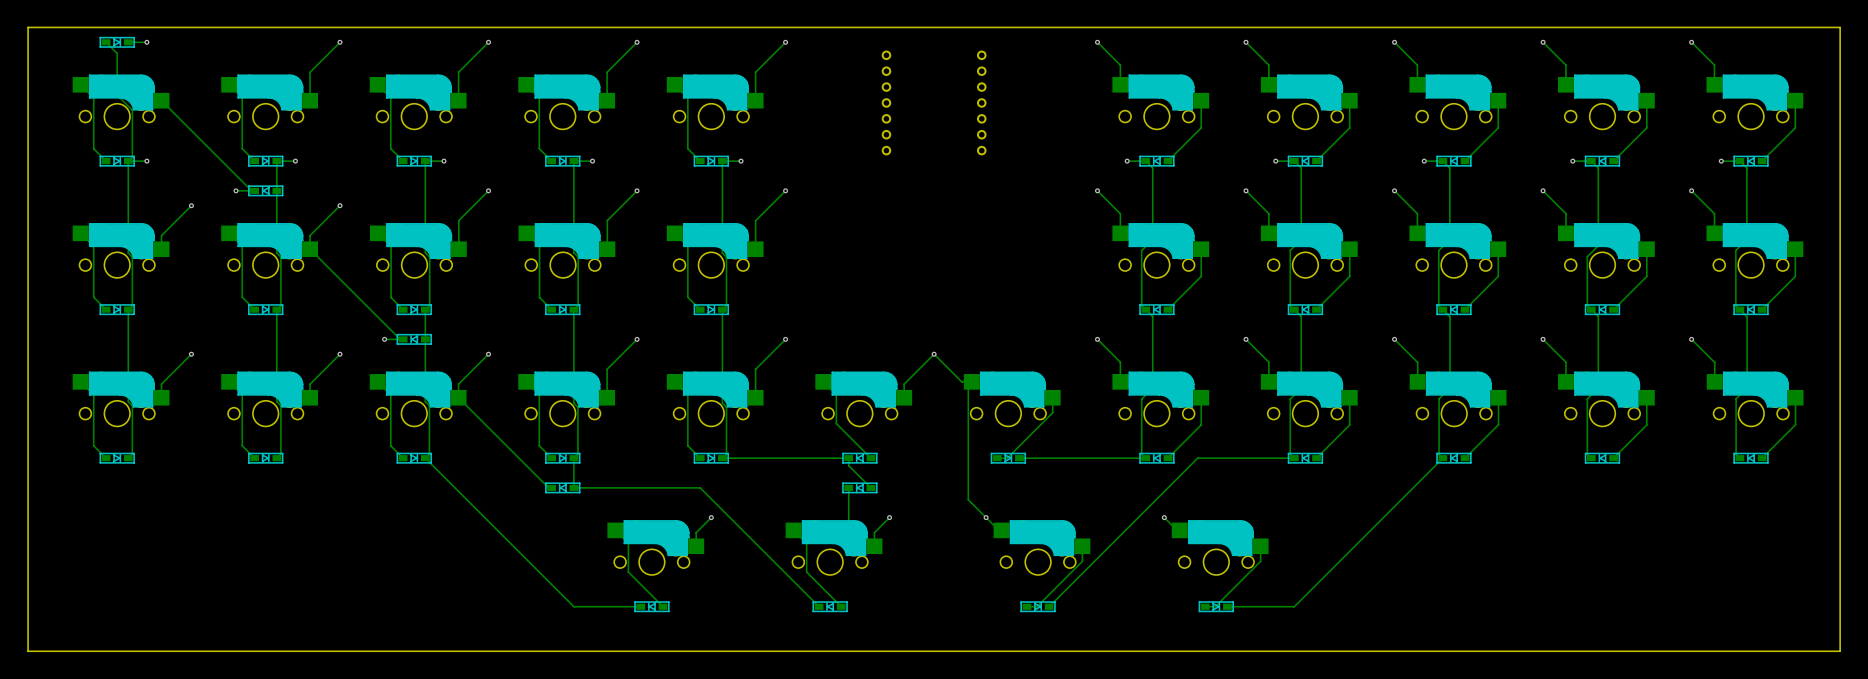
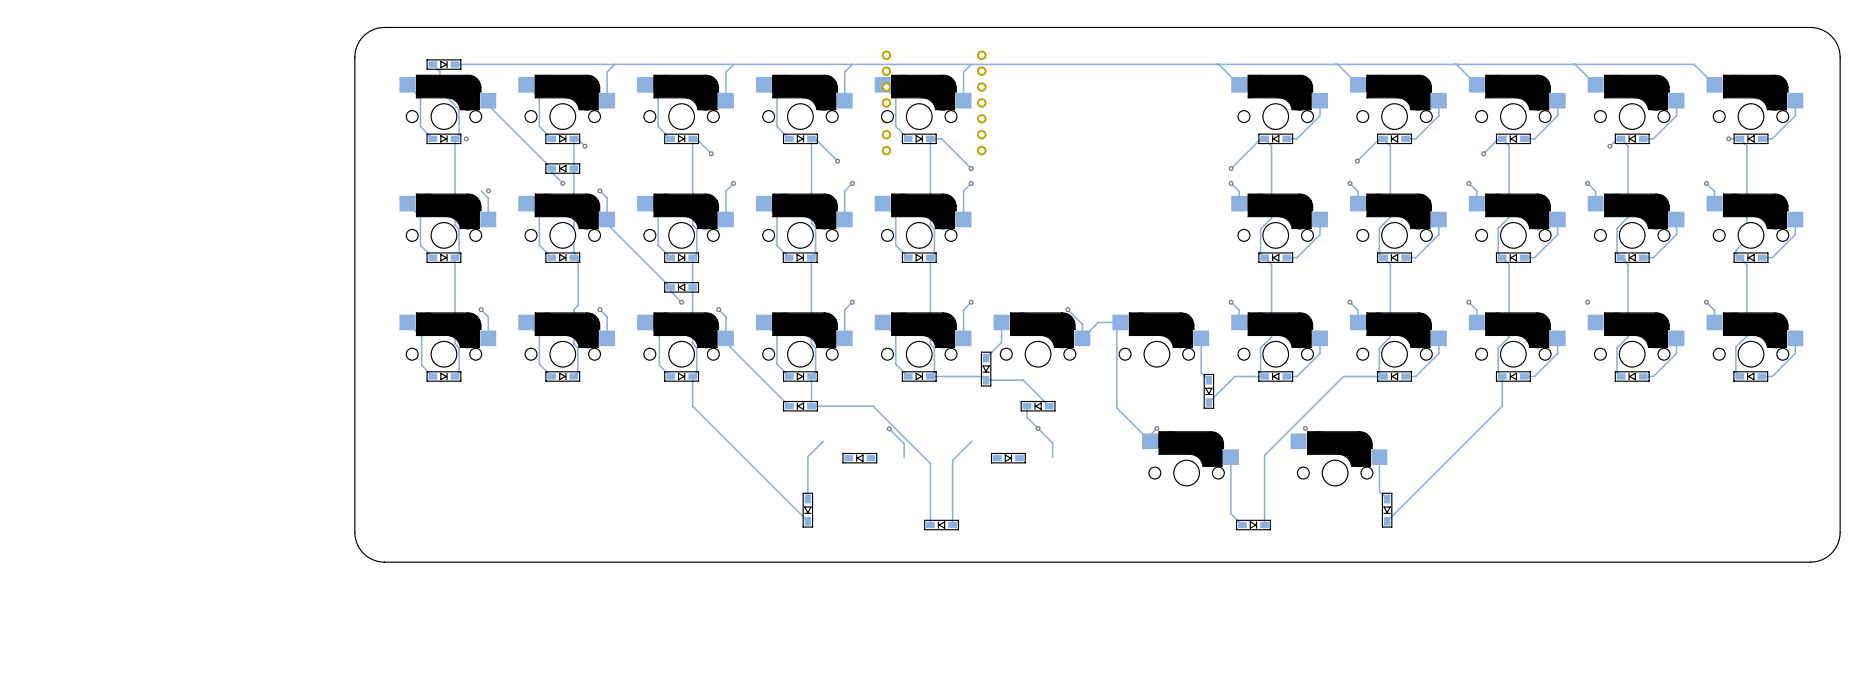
board edge: (384, 27) (28, 27) (28, 651) (1840, 651) (1840, 532) -> (384, 27) (374, 29) (363, 36) (356, 47) (354, 57) (354, 532) (359, 548) (366, 555) (374, 560) (384, 562) (1810, 562) (1823, 559) (1831, 553) (1837, 545) (1840, 532)
board edge: (1810, 27) (1840, 27) (1840, 57) -> (1810, 27) (1820, 29) (1831, 36) (1838, 47) (1840, 57)
track: (106, 42) (117, 53) (117, 95) (132, 110) (132, 157) (128, 161) -> none
part: (117, 42) -> none
track: (146, 42) (128, 42) -> none
via: (146, 42) -> none
track: (339, 42) (310, 72) (310, 100) -> none
via: (339, 42) -> none
track: (488, 42) (458, 72) (458, 100) -> none
via: (488, 42) -> none
track: (637, 42) (607, 72) -> (614, 64) (607, 72)
via: (637, 42) -> none
track: (785, 42) (755, 72) (755, 100) -> none
via: (785, 42) -> none
track: (1097, 42) (1120, 65) (1120, 84) -> none
via: (1097, 42) -> none
track: (1246, 42) (1268, 65) (1268, 84) -> none
via: (1246, 42) -> none
track: (1394, 42) (1417, 65) (1417, 84) -> none
via: (1394, 42) -> none
track: (1543, 42) (1565, 65) (1565, 84) -> none
via: (1543, 42) -> none
track: (1691, 42) (1714, 65) (1714, 84) -> (455, 64) (1694, 64) (1714, 84)
via: (1691, 42) -> none
track: none -> (432, 64) (439, 71) (439, 90) (459, 109) (459, 134) (455, 138) (455, 225) (459, 229) (459, 253) (455, 257) (455, 343) (459, 347) (459, 372) (455, 376)
part: none -> (443, 64)
track: none -> (733, 64) (725, 72) (725, 100)
track: none -> (852, 64) (844, 72) (844, 100)
track: none -> (971, 64) (963, 72) (963, 100)
track: none -> (1218, 64) (1239, 84)
track: none -> (1337, 64) (1358, 84)
track: none -> (1456, 64) (1476, 84)
track: none -> (1575, 64) (1595, 84)
track: (80, 84) (93, 97) (93, 148) (106, 161) -> none
track: (229, 84) (242, 97) (242, 148) (254, 161) -> none
track: (377, 84) (390, 97) (390, 148) (403, 161) -> none
track: none -> (407, 84) (420, 97) (420, 126) (432, 138)
track: none -> (645, 84) (658, 97) (658, 126) (670, 138)
track: (674, 84) (687, 97) (687, 148) (700, 161) -> none
track: none -> (763, 84) (776, 97) (776, 126) (789, 138)
track: none -> (882, 84) (895, 97) (895, 126) (908, 138)
track: (161, 100) (251, 190) -> none
track: none -> (488, 100) (488, 105) (551, 168) (551, 172) (562, 183)
track: (1201, 100) (1201, 127) (1168, 161) -> none
track: none -> (1320, 100) (1320, 115) (1296, 138) (1286, 138)
track: (1349, 100) (1349, 127) (1316, 161) -> none
track: none -> (1438, 100) (1438, 115) (1415, 138) (1405, 138)
track: (1498, 100) (1498, 127) (1465, 161) -> none
track: none -> (1557, 100) (1557, 115) (1534, 138) (1524, 138)
track: (1646, 100) (1646, 127) (1613, 161) -> none
track: none -> (1676, 100) (1676, 115) (1653, 138) (1643, 138)
part: (121, 102) -> none
part: (269, 102) -> none
part position: (418, 102) -> (447, 102)
part position: (715, 102) -> (685, 102)
part: none -> (804, 102)
part: none -> (923, 102)
part: (1160, 102) -> none
part position: (1309, 102) -> (1279, 102)
part: none -> (1398, 102)
part: (1457, 102) -> none
part: none -> (1517, 102)
part position: (1606, 102) -> (1636, 102)
track: (1795, 115) (1795, 127) (1762, 161) -> (1795, 115) (1772, 138) (1762, 138)
track: (539, 126) (539, 148) (551, 161) -> (539, 126) (551, 138)
part: none -> (562, 138)
part: none -> (800, 138)
part: none -> (919, 138)
part: none -> (1394, 138)
part: none -> (1513, 138)
via: none -> (1728, 138)
via: none -> (585, 146)
track: none -> (1609, 146) (1617, 138) (1621, 138) (1628, 145) (1628, 217) (1617, 228) (1617, 253) (1628, 264) (1628, 336) (1617, 347) (1617, 372) (1621, 376)
via: none -> (1609, 146)
track: none -> (711, 153) (696, 138) (692, 138) (692, 225) (696, 229) (696, 253) (692, 257) (692, 343) (696, 347) (696, 372) (692, 376) (692, 406) (807, 521)
via: none -> (711, 153)
track: none -> (1483, 153) (1498, 138) (1502, 138) (1509, 145) (1509, 217) (1498, 228) (1498, 253) (1509, 264) (1509, 336) (1498, 347) (1498, 372) (1502, 376) (1502, 406) (1387, 521)
via: none -> (1483, 153)
part: (117, 161) -> none
track: (128, 161) (128, 253) (132, 257) (132, 305) (128, 309) (128, 401) (132, 405) (132, 454) (128, 458) -> none
track: (146, 161) (128, 161) -> none
via: (146, 161) -> none
part: (265, 161) -> none
track: (295, 161) (276, 161) (276, 253) (280, 257) (280, 305) (276, 309) (276, 401) (280, 405) (280, 454) (276, 458) -> none
via: (295, 161) -> none
part position: (414, 161) -> (443, 138)
track: (443, 161) (425, 161) (425, 252) (429, 257) (429, 305) (425, 309) (425, 401) (429, 405) (429, 454) (425, 458) (573, 606) (640, 606) -> none
via position: (443, 161) -> (466, 138)
part rotation: 0° (562, 161) -> 180° (562, 168)
track: (592, 161) (573, 161) -> (585, 146) (577, 138) (573, 138) (573, 161)
via: (592, 161) -> none
part position: (711, 161) -> (681, 138)
track: (741, 161) (722, 161) (722, 253) (726, 257) (726, 305) (722, 309) (722, 403) (726, 407) (726, 454) (722, 458) (848, 458) (848, 465) (870, 487) -> none
via: (741, 161) -> none
track: none -> (837, 161) (815, 138) (811, 138) (811, 223) (815, 227) (815, 253) (811, 257) (811, 343) (815, 347) (815, 372) (811, 376) (811, 406) (873, 406) (930, 463) (930, 525)
via: none -> (837, 161)
track: (1127, 161) (1145, 161) (1152, 168) (1152, 239) (1141, 250) (1141, 305) (1152, 316) (1152, 388) (1141, 399) (1141, 454) (1145, 458) (1019, 458) -> none
via: (1127, 161) -> none
part: (1156, 161) -> none
track: (1275, 161) (1294, 161) (1301, 168) (1301, 239) (1290, 250) (1290, 305) (1301, 316) (1301, 388) (1290, 399) (1290, 454) (1294, 458) (1197, 458) (1049, 606) -> none
via: (1275, 161) -> none
part position: (1305, 161) -> (1275, 138)
track: none -> (1357, 161) (1379, 138) (1383, 138) (1390, 145) (1390, 217) (1379, 228) (1379, 253) (1390, 264) (1390, 336) (1379, 347) (1379, 372) (1383, 376) (1343, 376) (1264, 455) (1264, 525)
via: none -> (1357, 161)
track: (1424, 161) (1442, 161) (1449, 168) (1449, 239) (1438, 250) (1438, 305) (1450, 316) (1450, 387) (1439, 398) (1439, 454) (1442, 458) (1294, 606) (1227, 606) -> none
via: (1424, 161) -> none
part: (1453, 161) -> none
track: (1572, 161) (1591, 161) (1598, 168) (1598, 245) (1587, 256) (1587, 305) (1598, 316) (1598, 388) (1587, 399) (1587, 454) (1591, 458) -> none
via: (1572, 161) -> none
part position: (1602, 161) -> (1632, 138)
track: (1721, 161) (1739, 161) (1746, 168) -> (1728, 138) (1739, 138) (1746, 145) (1746, 168)
via: (1721, 161) -> none
part position: (1751, 161) -> (1751, 138)
track: none -> (971, 168) (941, 138) (930, 138) (930, 225) (934, 229) (934, 253) (930, 257) (930, 343) (934, 347) (934, 372) (930, 376) (982, 376) (986, 380) (1023, 380) (1049, 406)
via: none -> (971, 168)
track: none -> (1231, 168) (1260, 138) (1264, 138) (1271, 145) (1271, 218) (1260, 229) (1260, 253) (1271, 264) (1271, 336) (1260, 347) (1260, 372) (1264, 376) (1234, 376) (1208, 402)
via: none -> (1231, 168)
via: none -> (562, 183)
track: none -> (733, 183) (725, 191) (725, 219)
via: none -> (733, 183)
track: none -> (852, 183) (844, 191) (844, 219)
via: none -> (852, 183)
track: none -> (971, 183) (963, 191) (963, 219)
via: none -> (971, 183)
track: none -> (1231, 183) (1239, 191) (1239, 203)
via: none -> (1231, 183)
track: none -> (1349, 183) (1358, 191) (1358, 203)
via: none -> (1349, 183)
track: none -> (1468, 183) (1476, 191) (1476, 203)
via: none -> (1468, 183)
track: none -> (1587, 183) (1595, 191) (1595, 203)
via: none -> (1587, 183)
track: none -> (1706, 183) (1714, 191) (1714, 203)
via: none -> (1706, 183)
via: (236, 190) -> none
track: (254, 190) (236, 190) -> none
part: (265, 190) -> none
track: none -> (481, 190) (488, 198) (488, 219)
track: (488, 190) (458, 220) (458, 249) -> none
track: none -> (599, 190) (607, 198) (607, 223) (670, 287) (670, 291) (681, 302)
via: none -> (599, 190)
track: (637, 190) (607, 220) (607, 249) -> none
via: (637, 190) -> none
track: (785, 190) (755, 220) (755, 249) -> none
via: (785, 190) -> none
track: (1097, 190) (1120, 213) (1120, 233) -> none
via: (1097, 190) -> none
track: (1246, 190) (1268, 213) (1268, 233) -> none
via: (1246, 190) -> none
track: (1394, 190) (1417, 213) (1417, 233) -> none
via: (1394, 190) -> none
track: (1543, 190) (1565, 213) (1565, 233) -> none
via: (1543, 190) -> none
track: (1691, 190) (1714, 213) (1714, 233) -> none
via: (1691, 190) -> none
track: none -> (407, 203) (420, 216) (420, 245) (432, 257)
track: none -> (526, 203) (539, 216) (539, 245) (551, 257)
track: none -> (645, 203) (658, 216) (658, 245) (670, 257)
track: none -> (763, 203) (776, 216) (776, 245) (789, 257)
track: none -> (882, 203) (895, 216) (895, 245) (908, 257)
track: (191, 205) (161, 235) (161, 249) -> none
via: (191, 205) -> none
track: (339, 205) (310, 235) (310, 249) (400, 339) -> none
via: (339, 205) -> none
track: none -> (1320, 219) (1320, 234) (1296, 257) (1286, 257)
track: none -> (1438, 219) (1438, 234) (1415, 257) (1405, 257)
track: none -> (1557, 219) (1557, 234) (1534, 257) (1524, 257)
track: none -> (1676, 219) (1676, 234) (1653, 257) (1643, 257)
track: none -> (1795, 219) (1795, 234) (1772, 257) (1762, 257)
part: none -> (804, 220)
part: none -> (923, 220)
part: none -> (1398, 220)
part: none -> (1517, 220)
track: (80, 233) (93, 246) (93, 297) (106, 309) -> none
track: (229, 233) (242, 246) (242, 297) (254, 309) -> none
track: (377, 233) (391, 246) (391, 297) (403, 309) -> none
track: (526, 233) (539, 246) (539, 297) (551, 309) -> none
track: (674, 233) (687, 246) (687, 297) (700, 309) -> none
track: (1201, 249) (1201, 276) (1168, 309) -> none
track: (1349, 249) (1349, 276) (1316, 309) -> none
track: (1498, 249) (1498, 276) (1465, 309) -> none
track: (1646, 249) (1646, 276) (1613, 309) -> none
track: (1795, 249) (1795, 276) (1762, 309) -> none
part: (121, 250) -> none
part: (269, 250) -> none
part position: (418, 250) -> (447, 220)
part position: (566, 250) -> (566, 220)
part position: (715, 250) -> (685, 220)
part: (1160, 250) -> none
part position: (1309, 250) -> (1279, 220)
part: (1457, 250) -> none
part position: (1606, 250) -> (1636, 220)
part position: (1754, 250) -> (1754, 220)
track: (1735, 253) (1735, 305) (1747, 316) (1747, 387) (1736, 398) (1736, 454) (1739, 458) -> (1735, 253) (1746, 264) (1746, 336) (1735, 347) (1735, 372) (1739, 376)
part: none -> (443, 257)
part: none -> (562, 257)
part: none -> (681, 257)
part: none -> (800, 257)
part: none -> (919, 257)
part: none -> (1275, 257)
part: none -> (1394, 257)
part: none -> (1513, 257)
part: none -> (1632, 257)
part: none -> (1751, 257)
part: none -> (681, 287)
via: none -> (681, 302)
track: none -> (852, 302) (844, 309) (844, 338)
via: none -> (852, 302)
track: none -> (971, 302) (963, 309) (963, 338)
via: none -> (971, 302)
track: none -> (1231, 302) (1239, 310) (1239, 322)
via: none -> (1231, 302)
track: none -> (1349, 302) (1358, 310) (1358, 322)
via: none -> (1349, 302)
track: none -> (1468, 302) (1476, 310) (1476, 322)
via: none -> (1468, 302)
via: none -> (1587, 302)
track: none -> (1706, 302) (1714, 310) (1714, 322)
via: none -> (1706, 302)
part: (117, 309) -> none
part: (265, 309) -> none
part: (414, 309) -> none
track: none -> (481, 309) (488, 316) (488, 338)
via: none -> (481, 309)
part: (562, 309) -> none
track: none -> (599, 309) (607, 316) (607, 338)
via: none -> (599, 309)
part: (711, 309) -> none
track: none -> (718, 309) (725, 316) (725, 342) (789, 406)
via: none -> (718, 309)
track: none -> (1067, 309) (1082, 324) (1082, 338) (1098, 322) (1120, 322) (1116, 325) (1116, 408) (1150, 441) (1150, 435) (1156, 428)
via: none -> (1067, 309)
part: (1156, 309) -> none
part: (1305, 309) -> none
part: (1453, 309) -> none
part: (1602, 309) -> none
part: (1751, 309) -> none
track: none -> (407, 322) (421, 336) (421, 365) (432, 376)
track: none -> (526, 322) (539, 335) (539, 364) (551, 376)
track: none -> (645, 322) (659, 336) (659, 365) (670, 376)
track: none -> (763, 322) (776, 335) (776, 364) (789, 376)
track: none -> (882, 322) (895, 335) (895, 364) (908, 376)
track: none -> (1001, 322) (1001, 342) (986, 357)
track: none -> (1201, 338) (1201, 372) (1208, 380)
track: none -> (1320, 338) (1320, 353) (1296, 376) (1286, 376)
track: none -> (1438, 338) (1438, 353) (1415, 376) (1405, 376)
track: none -> (1557, 338) (1557, 353) (1534, 376) (1524, 376)
track: none -> (1676, 338) (1676, 353) (1653, 376) (1643, 376)
track: none -> (1795, 338) (1795, 353) (1772, 376) (1761, 376)
via: (384, 339) -> none
track: (403, 339) (384, 339) -> none
part: (414, 339) -> none
part: none -> (447, 339)
part: none -> (566, 339)
track: (637, 339) (607, 369) (607, 397) -> none
via: (637, 339) -> none
part: none -> (685, 339)
track: (785, 339) (755, 369) (755, 397) -> none
via: (785, 339) -> none
part: none -> (804, 339)
part: none -> (923, 339)
part: none -> (1041, 339)
track: (1097, 339) (1120, 362) (1120, 381) -> none
via: (1097, 339) -> none
part: none -> (1160, 339)
track: (1246, 339) (1268, 362) (1268, 381) -> none
via: (1246, 339) -> none
part: none -> (1279, 339)
track: (1394, 339) (1417, 362) (1417, 381) -> none
via: (1394, 339) -> none
part: none -> (1398, 339)
part: none -> (1517, 339)
track: (1543, 339) (1565, 362) (1565, 381) -> none
via: (1543, 339) -> none
part: none -> (1636, 339)
track: (1691, 339) (1714, 362) (1714, 381) -> none
via: (1691, 339) -> none
part: none -> (1754, 339)
track: (573, 343) (573, 403) (577, 407) (577, 454) (573, 458) (573, 487) (700, 487) (819, 606) -> (573, 343) (577, 347) (577, 372) (573, 376)
track: (191, 354) (161, 384) (161, 397) -> none
via: (191, 354) -> none
track: (339, 354) (310, 384) (310, 397) -> none
via: (339, 354) -> none
track: (488, 354) (458, 384) (458, 397) (548, 487) (551, 487) -> none
via: (488, 354) -> none
via: (934, 354) -> none
part: none -> (986, 369)
part: none -> (443, 376)
part: none -> (562, 376)
part: none -> (681, 376)
part: none -> (800, 376)
part: none -> (919, 376)
part: none -> (1275, 376)
part: none -> (1394, 376)
part: none -> (1513, 376)
part: none -> (1632, 376)
part: none -> (1750, 376)
track: (80, 381) (93, 394) (93, 445) (106, 458) -> none
track: (229, 381) (242, 394) (242, 445) (254, 458) -> none
track: (377, 381) (390, 394) (390, 445) (403, 458) -> none
track: (526, 381) (539, 394) (539, 445) (551, 458) -> none
track: (674, 381) (687, 394) (687, 445) (700, 458) -> none
track: (823, 381) (836, 394) (836, 423) (870, 458) -> none
part: none -> (1208, 391)
track: (904, 397) (904, 384) (934, 354) (961, 381) (971, 381) (968, 385) (968, 499) (998, 530) (1001, 530) -> none
track: (1052, 397) (1052, 412) (1007, 458) (997, 458) -> none
track: (1201, 397) (1201, 424) (1168, 458) -> none
track: (1349, 397) (1349, 424) (1316, 458) -> none
track: (1498, 397) (1498, 424) (1465, 458) -> none
track: (1646, 397) (1646, 424) (1613, 458) -> none
track: (1795, 397) (1795, 424) (1762, 458) -> none
part: (121, 399) -> none
part: (269, 399) -> none
part: (418, 399) -> none
part: (566, 399) -> none
part: (715, 399) -> none
part: (863, 399) -> none
part: (1012, 399) -> none
part: (1160, 399) -> none
part: (1309, 399) -> none
part: (1458, 399) -> none
part: (1606, 399) -> none
part: (1755, 399) -> none
part: none -> (800, 406)
track: none -> (1026, 406) (1026, 417) (1052, 443) (1052, 457)
part: none -> (1038, 406)
track: none -> (889, 428) (904, 443) (904, 457)
via: none -> (889, 428)
via: none -> (1038, 428)
via: none -> (1156, 428)
via: none -> (1305, 428)
track: none -> (823, 441) (807, 456) (807, 499)
track: none -> (971, 441) (952, 460) (952, 525)
track: none -> (1230, 457) (1230, 513) (1242, 525)
track: none -> (1379, 457) (1379, 491) (1387, 499)
part: (117, 458) -> none
part: (265, 458) -> none
part: (414, 458) -> none
part: (562, 458) -> none
part: (711, 458) -> none
part: (1156, 458) -> none
part: none -> (1190, 458)
part: (1305, 458) -> none
part: none -> (1339, 458)
part: (1453, 458) -> none
part: (1602, 458) -> none
part: (1751, 458) -> none
part: (562, 487) -> none
track: (848, 487) (848, 520) (874, 546) (874, 532) (889, 517) -> none
part: (859, 487) -> none
part: none -> (807, 510)
part: none -> (1387, 510)
track: (711, 517) (696, 532) (696, 546) -> none
via: (711, 517) -> none
via: (889, 517) -> none
via: (986, 517) -> none
track: (1164, 517) (1177, 530) (1179, 530) -> none
via: (1164, 517) -> none
part: none -> (941, 525)
part: none -> (1253, 525)
track: (615, 530) (628, 543) (628, 572) (663, 606) -> none
track: (793, 530) (806, 543) (806, 572) (841, 606) -> none
track: (1082, 546) (1082, 561) (1037, 606) (1026, 606) -> none
track: (1260, 546) (1260, 561) (1215, 606) (1205, 606) -> none
part: (655, 547) -> none
part: (834, 547) -> none
part: (1041, 547) -> none
part: (1220, 547) -> none
part: (651, 606) -> none
part: (830, 606) -> none
part: (1038, 606) -> none
part: (1216, 606) -> none

